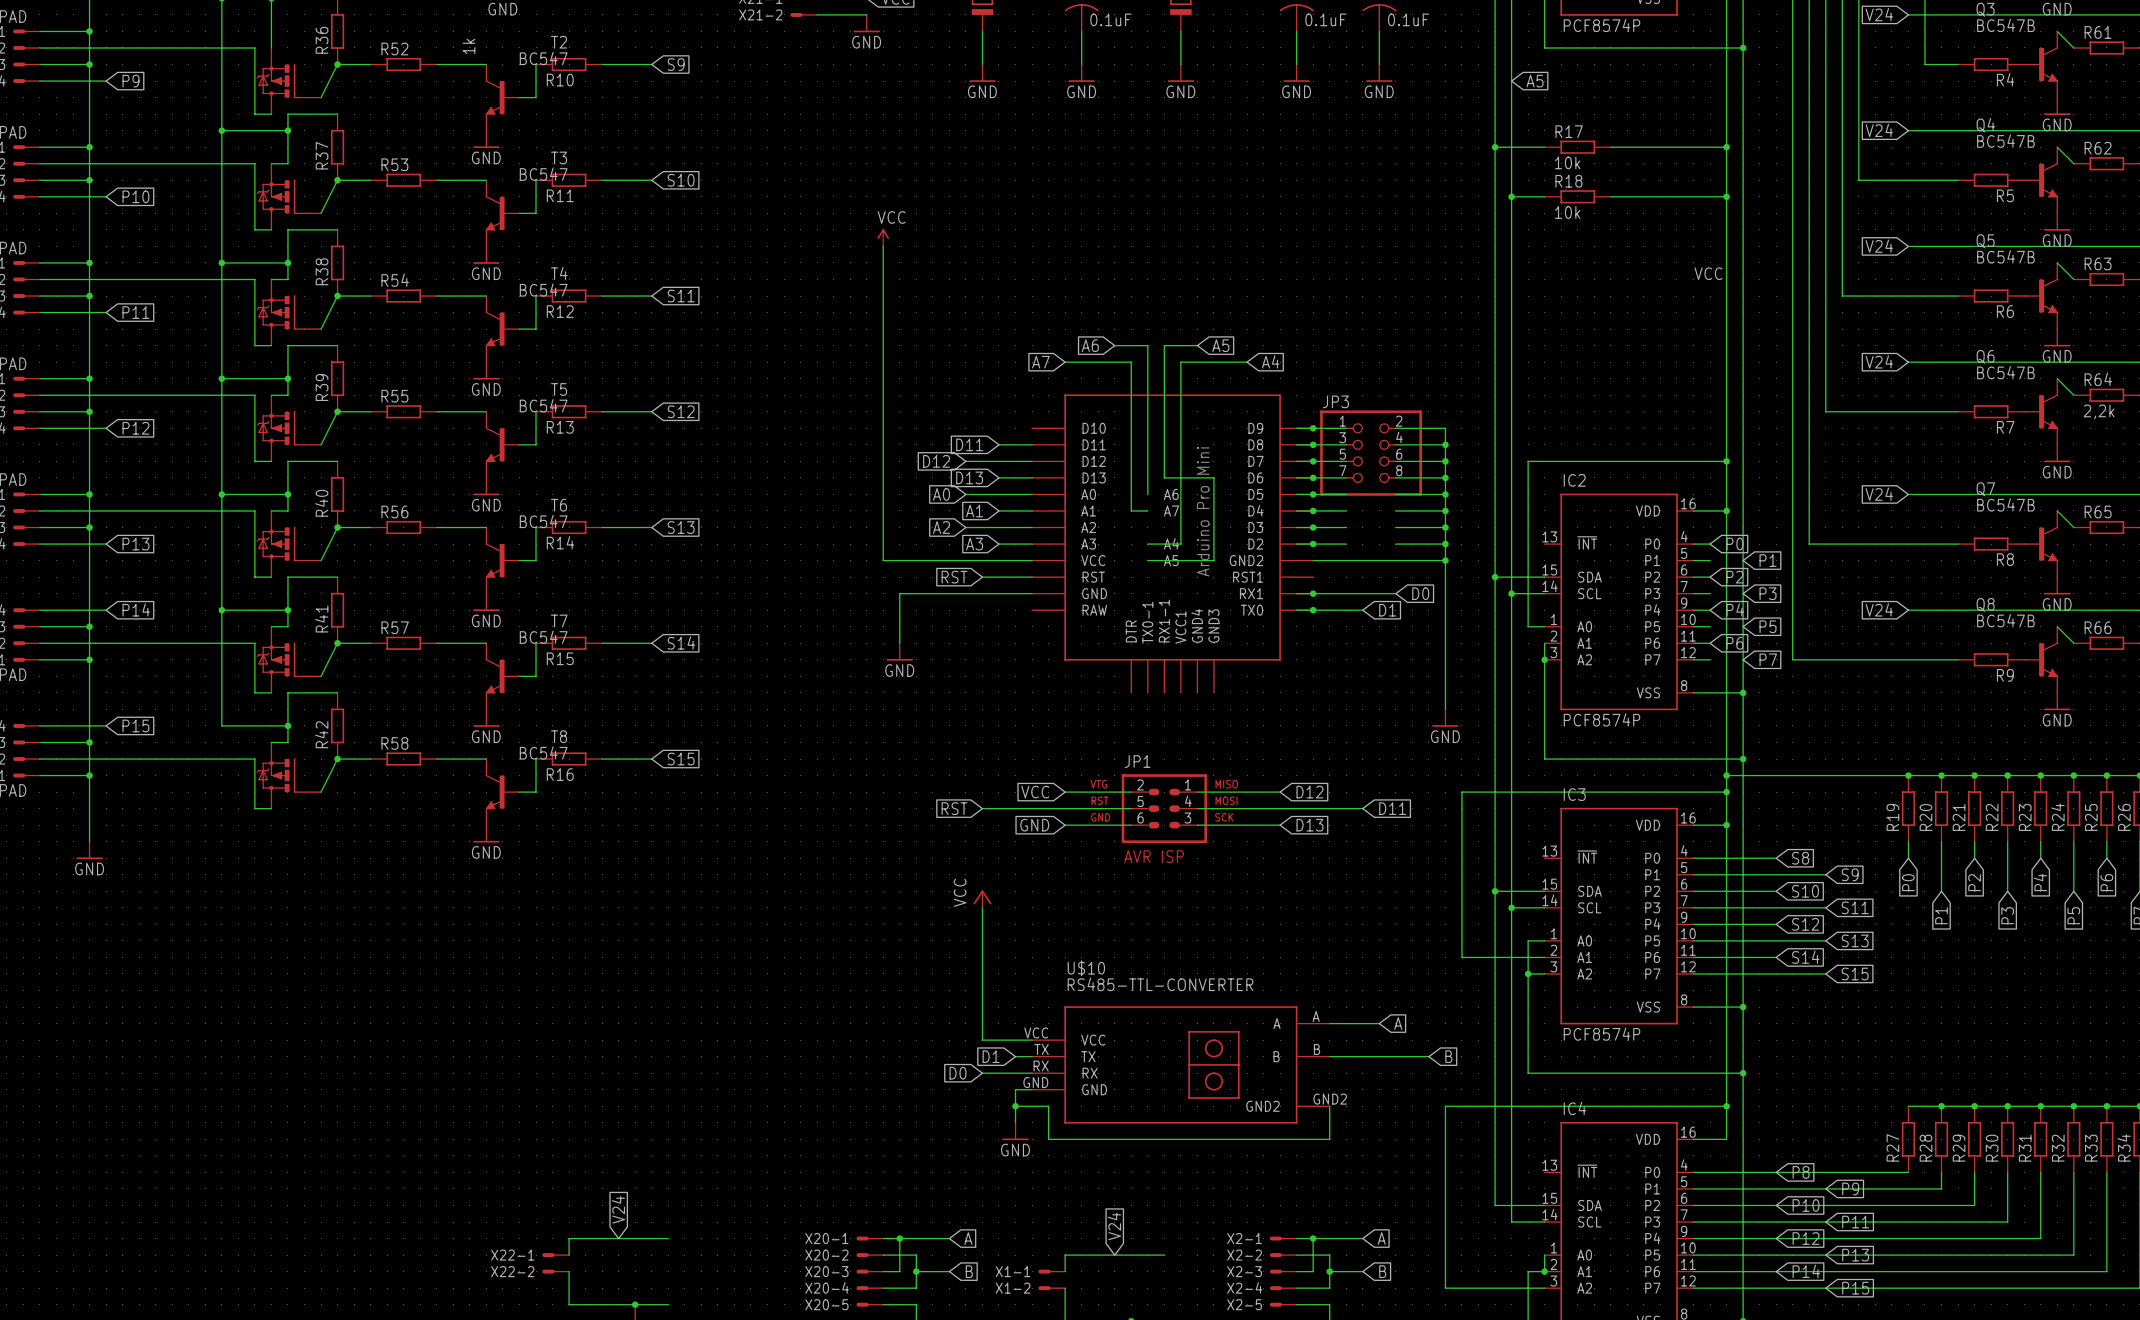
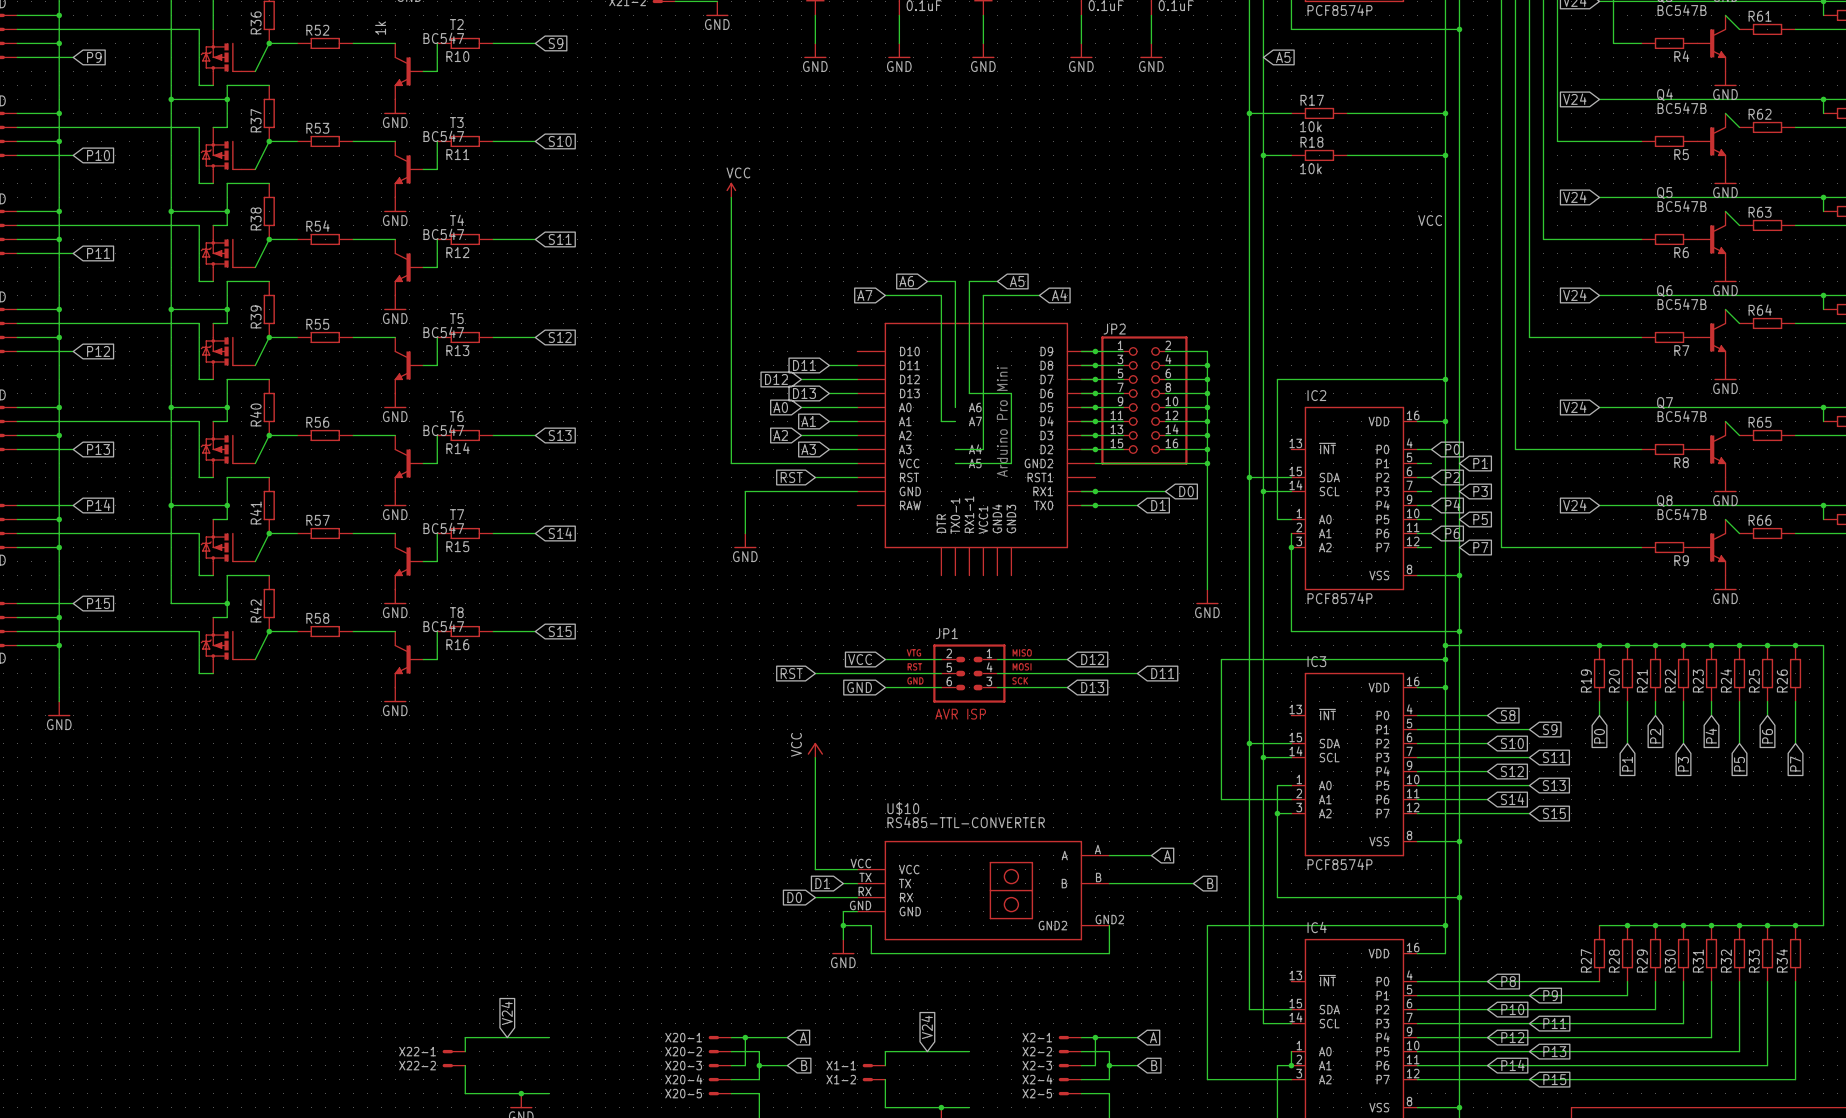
R64 value: 2,2k (2099, 411) -> none
JP3: (1371, 453) -> none
JP2: none -> (1144, 400)

